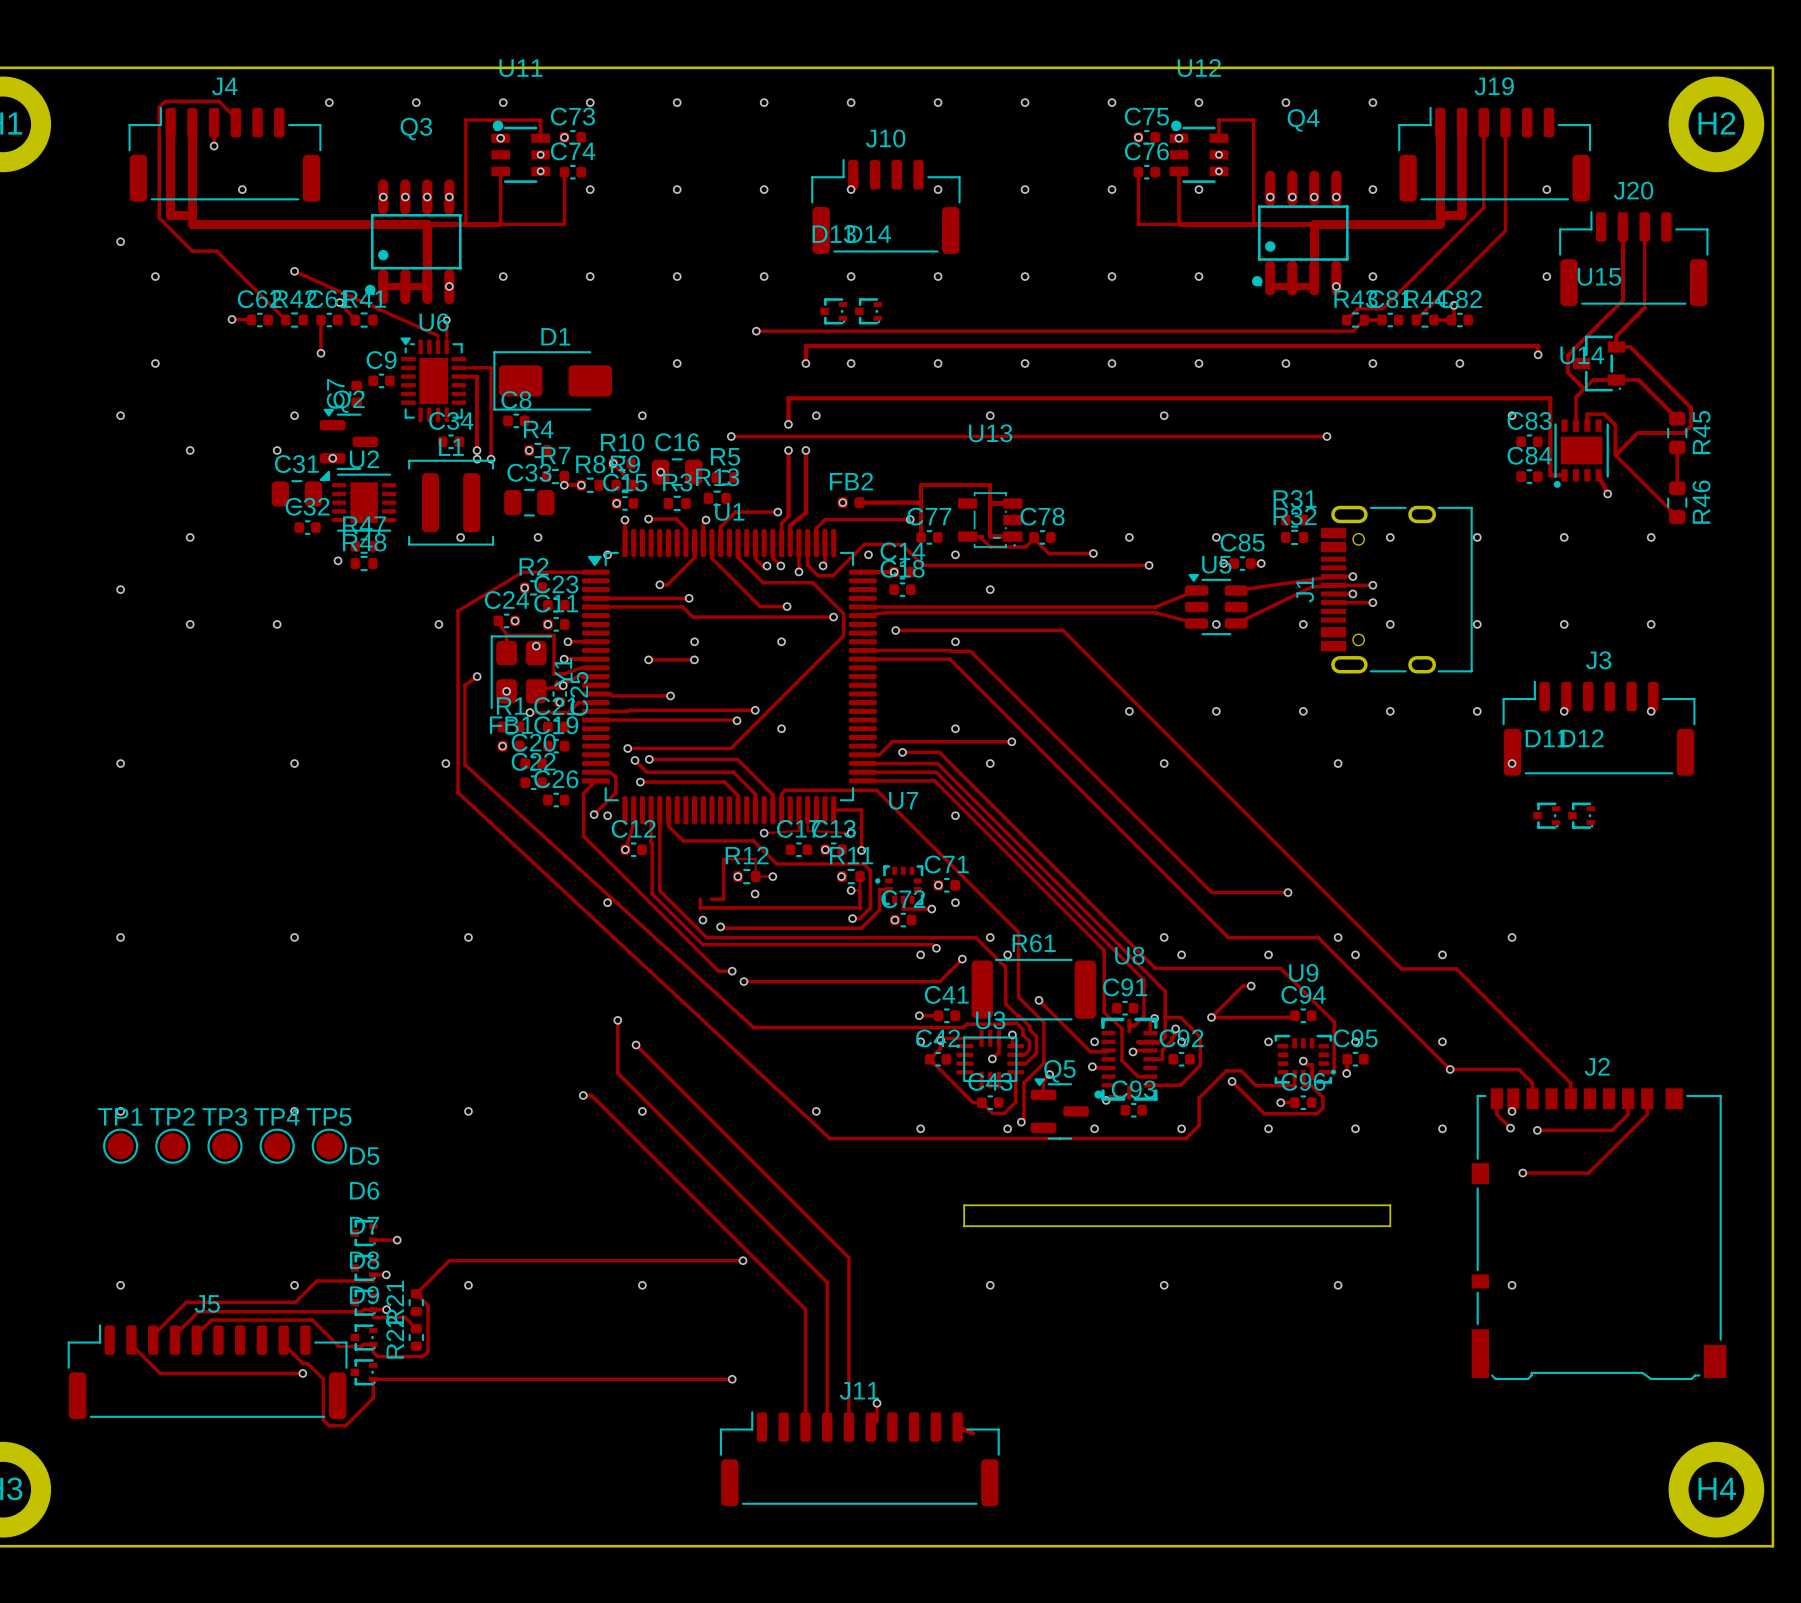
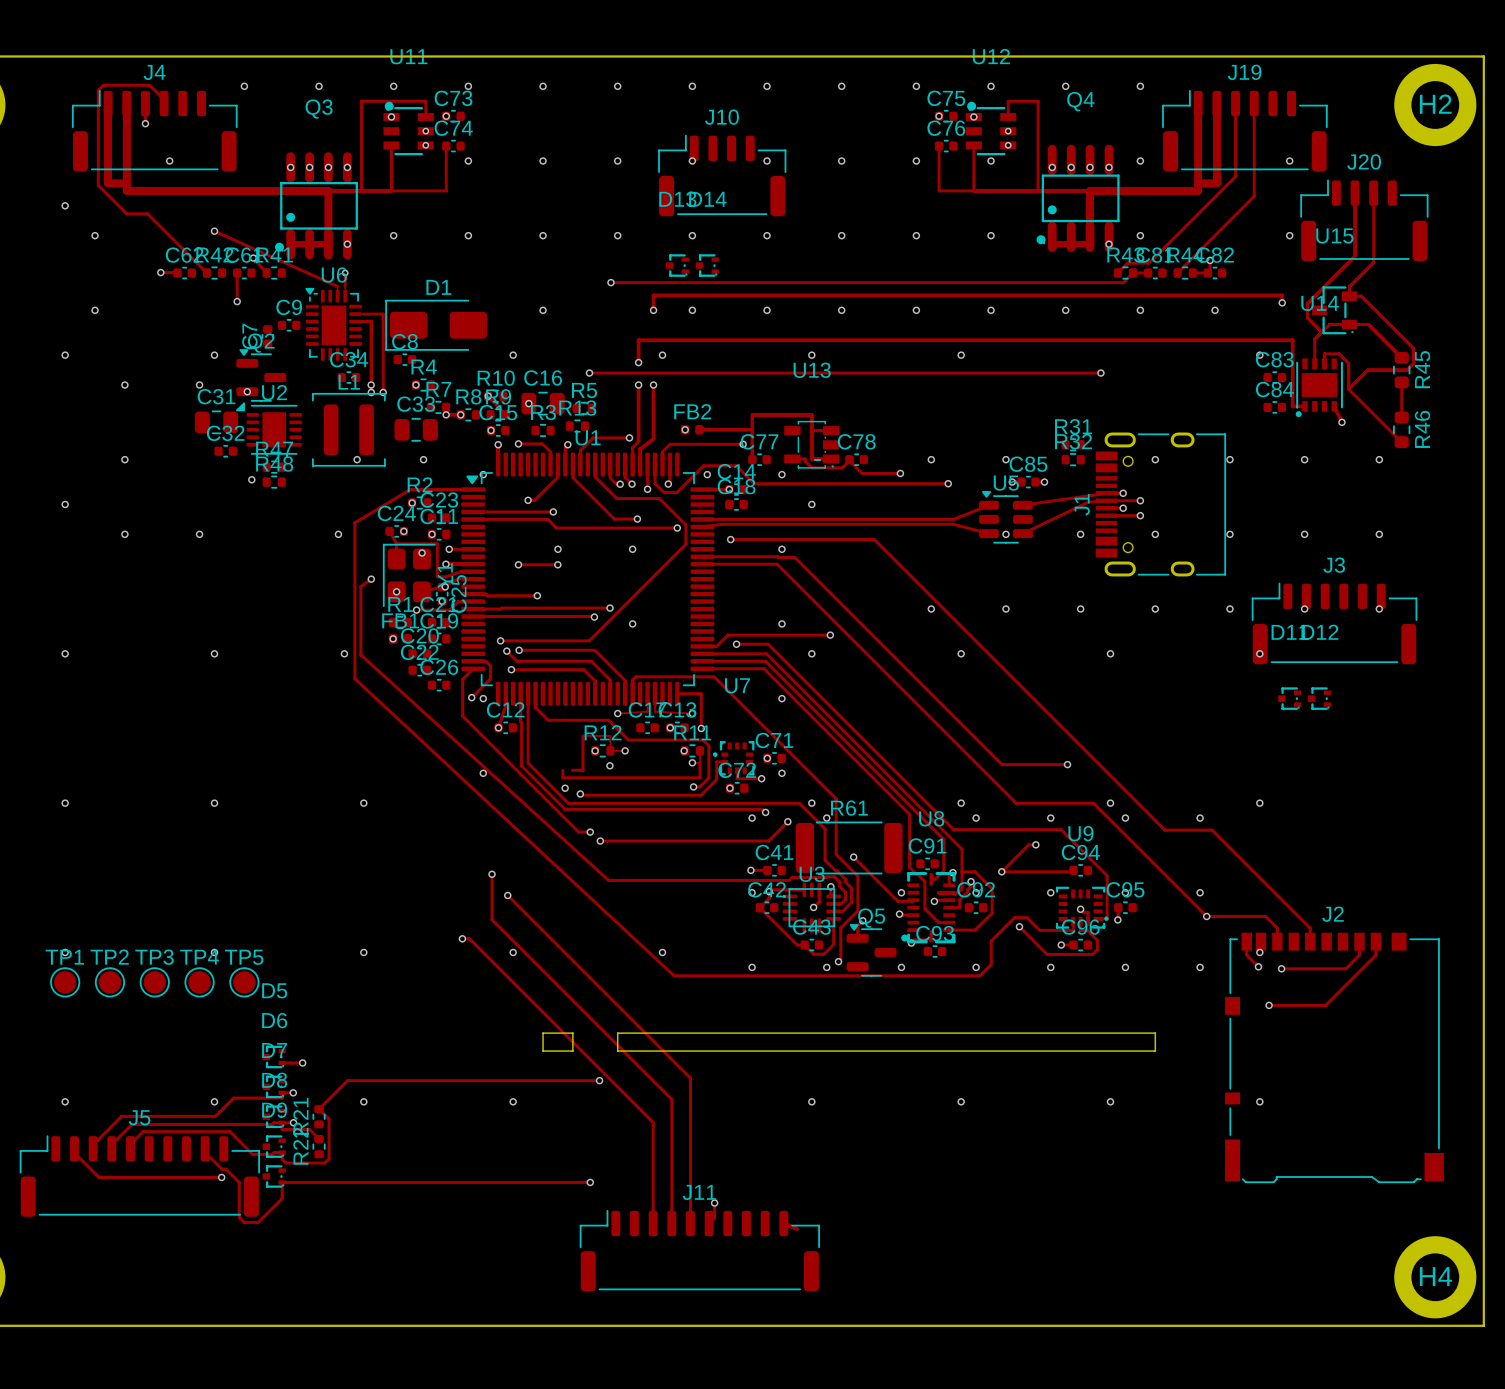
board edge: none -> (543, 1033) (572, 1033) (572, 1051) (543, 1051) (543, 1033)
board edge: (964, 1205) (964, 1226) -> (789, 1033) (617, 1033) (617, 1051) (789, 1051)

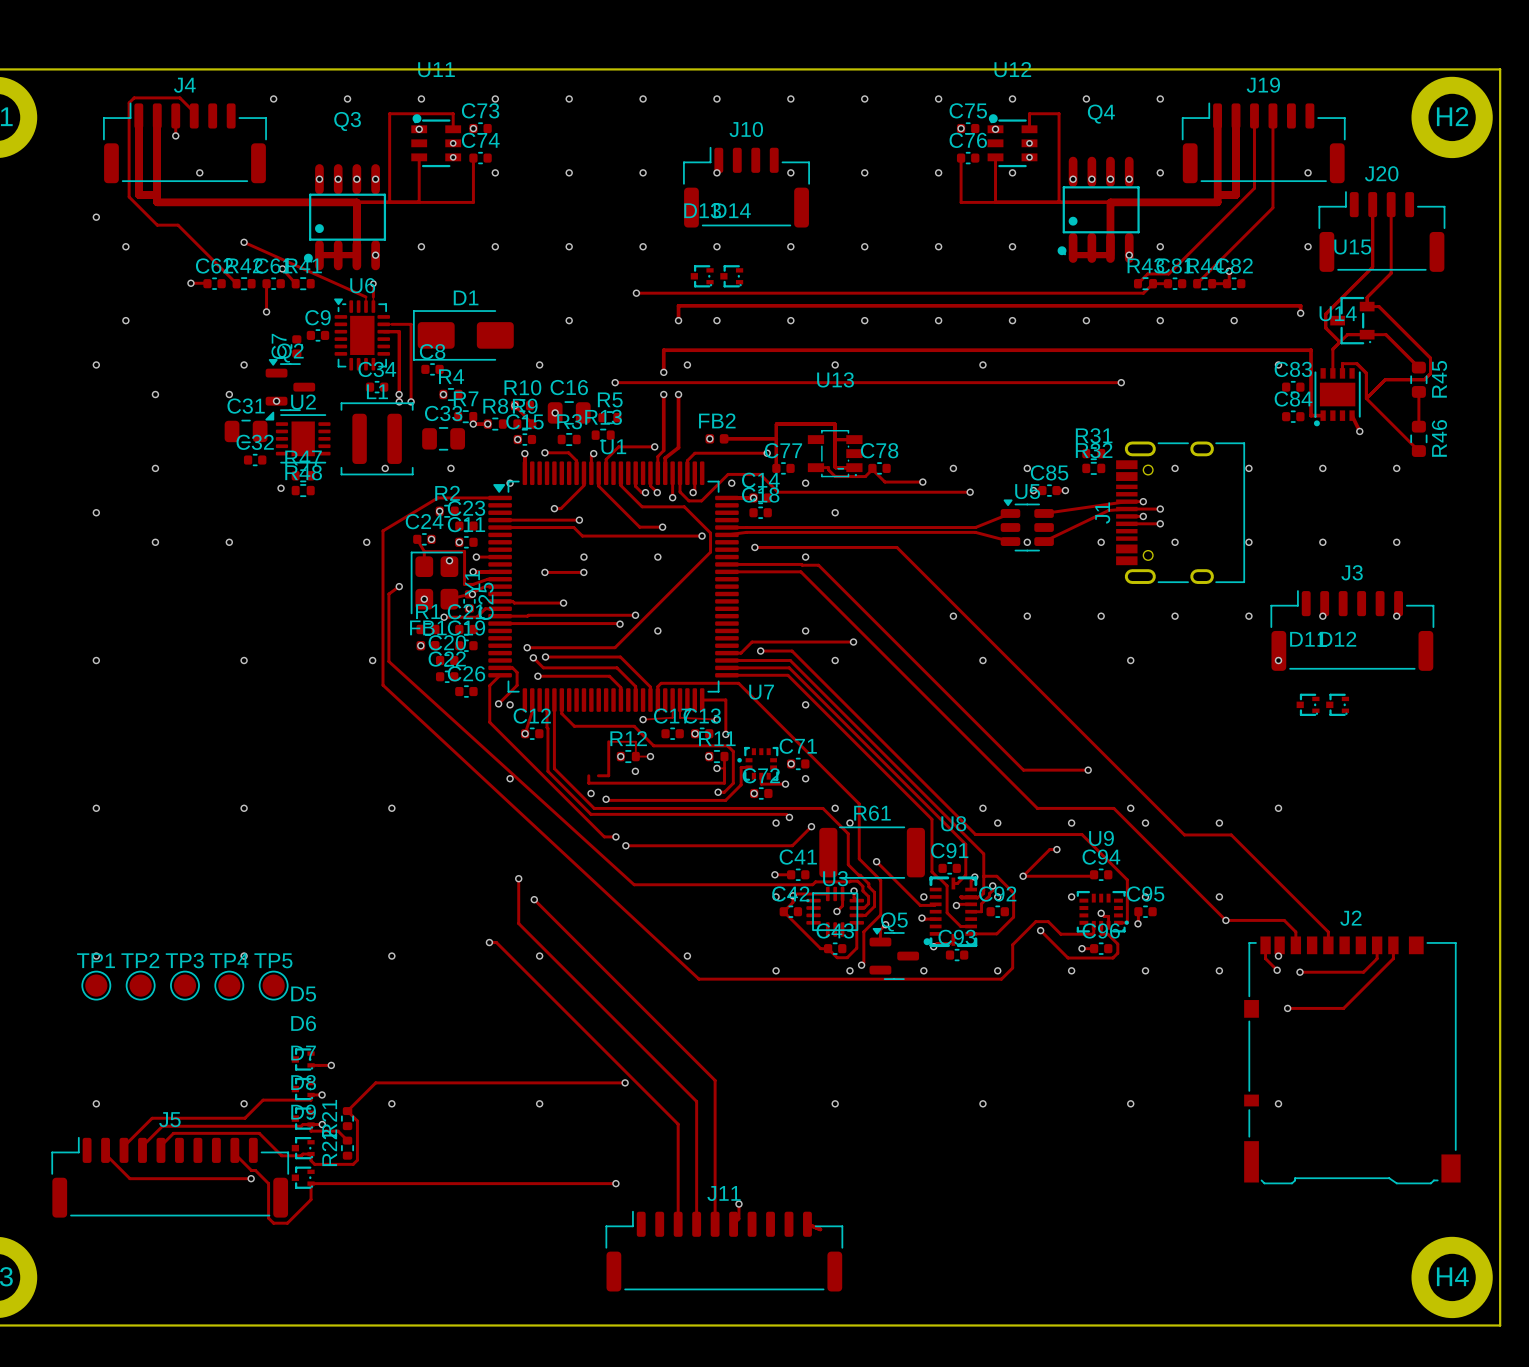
board edge: (543, 1033) (572, 1033) (572, 1051) (543, 1051) (543, 1033) -> none
board edge: (617, 1033) (1155, 1033) (1155, 1051) (617, 1051) (617, 1033) -> none

